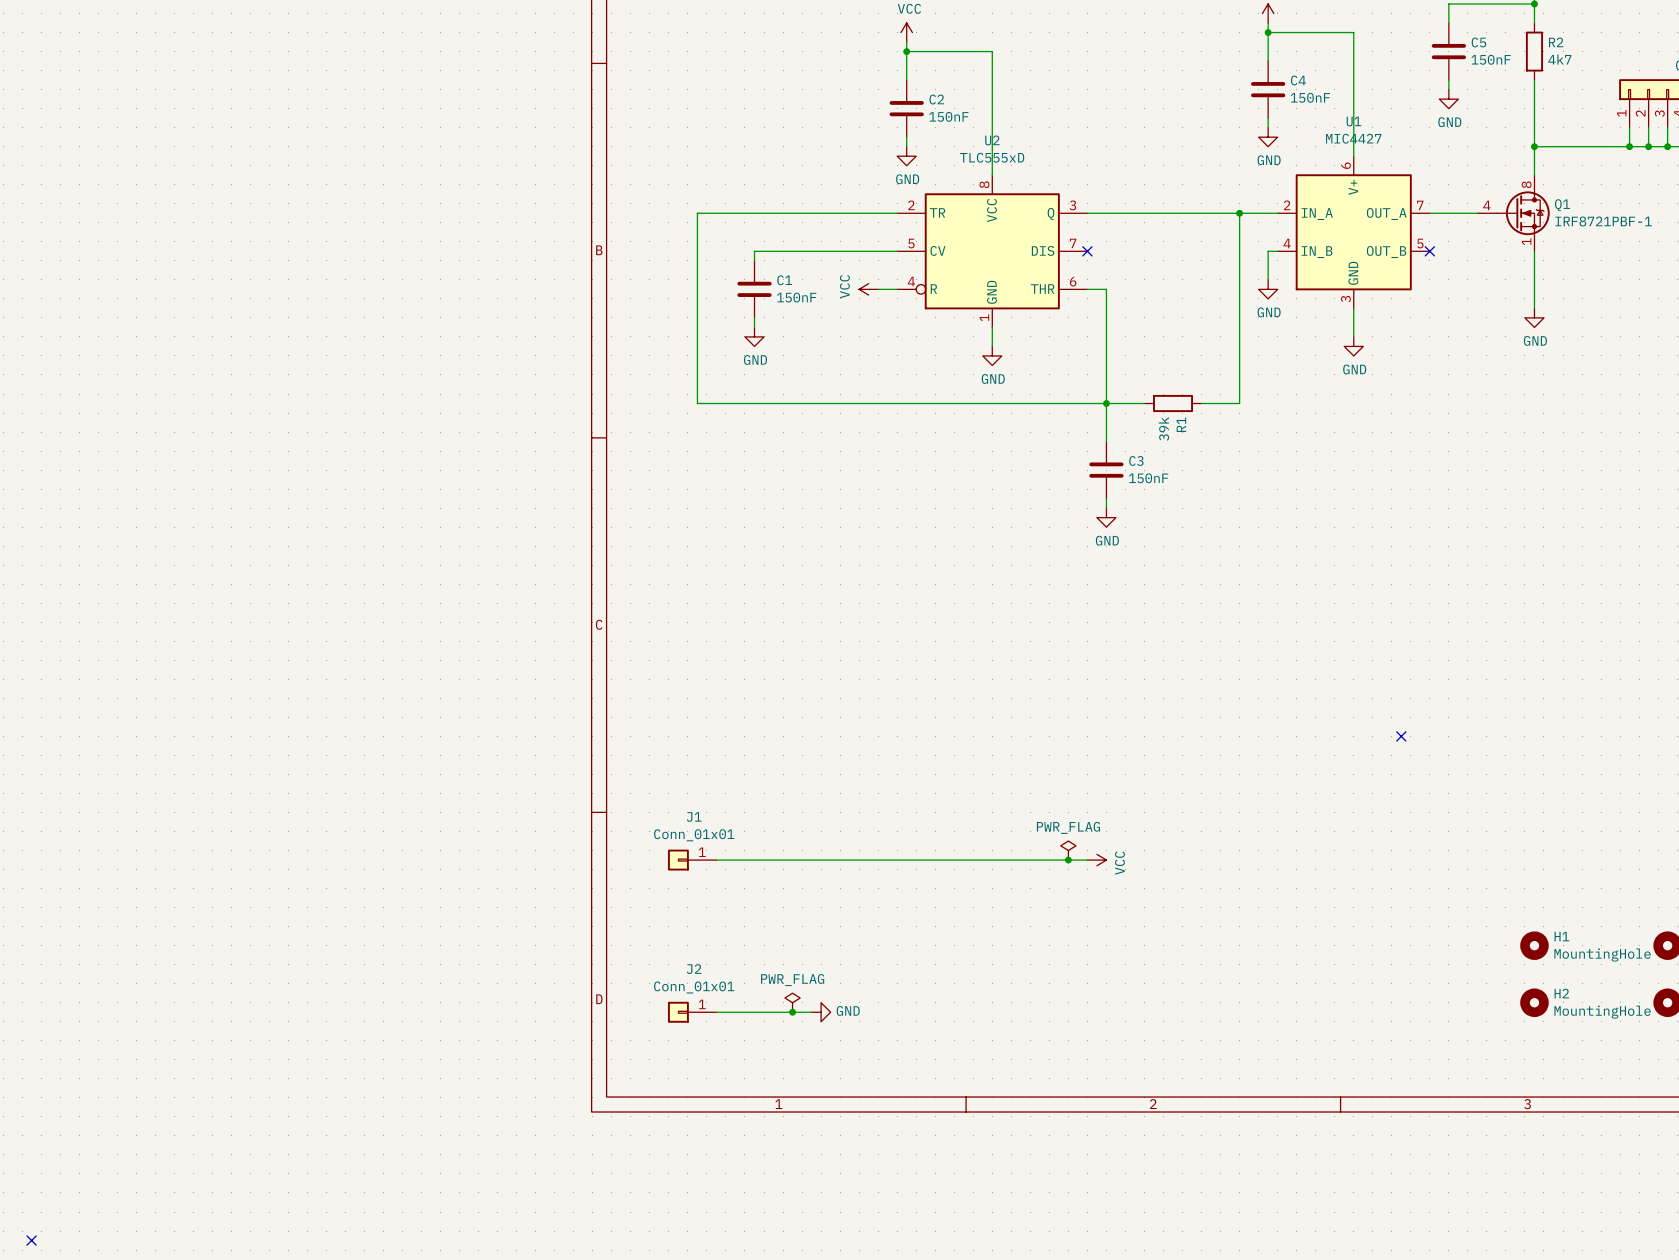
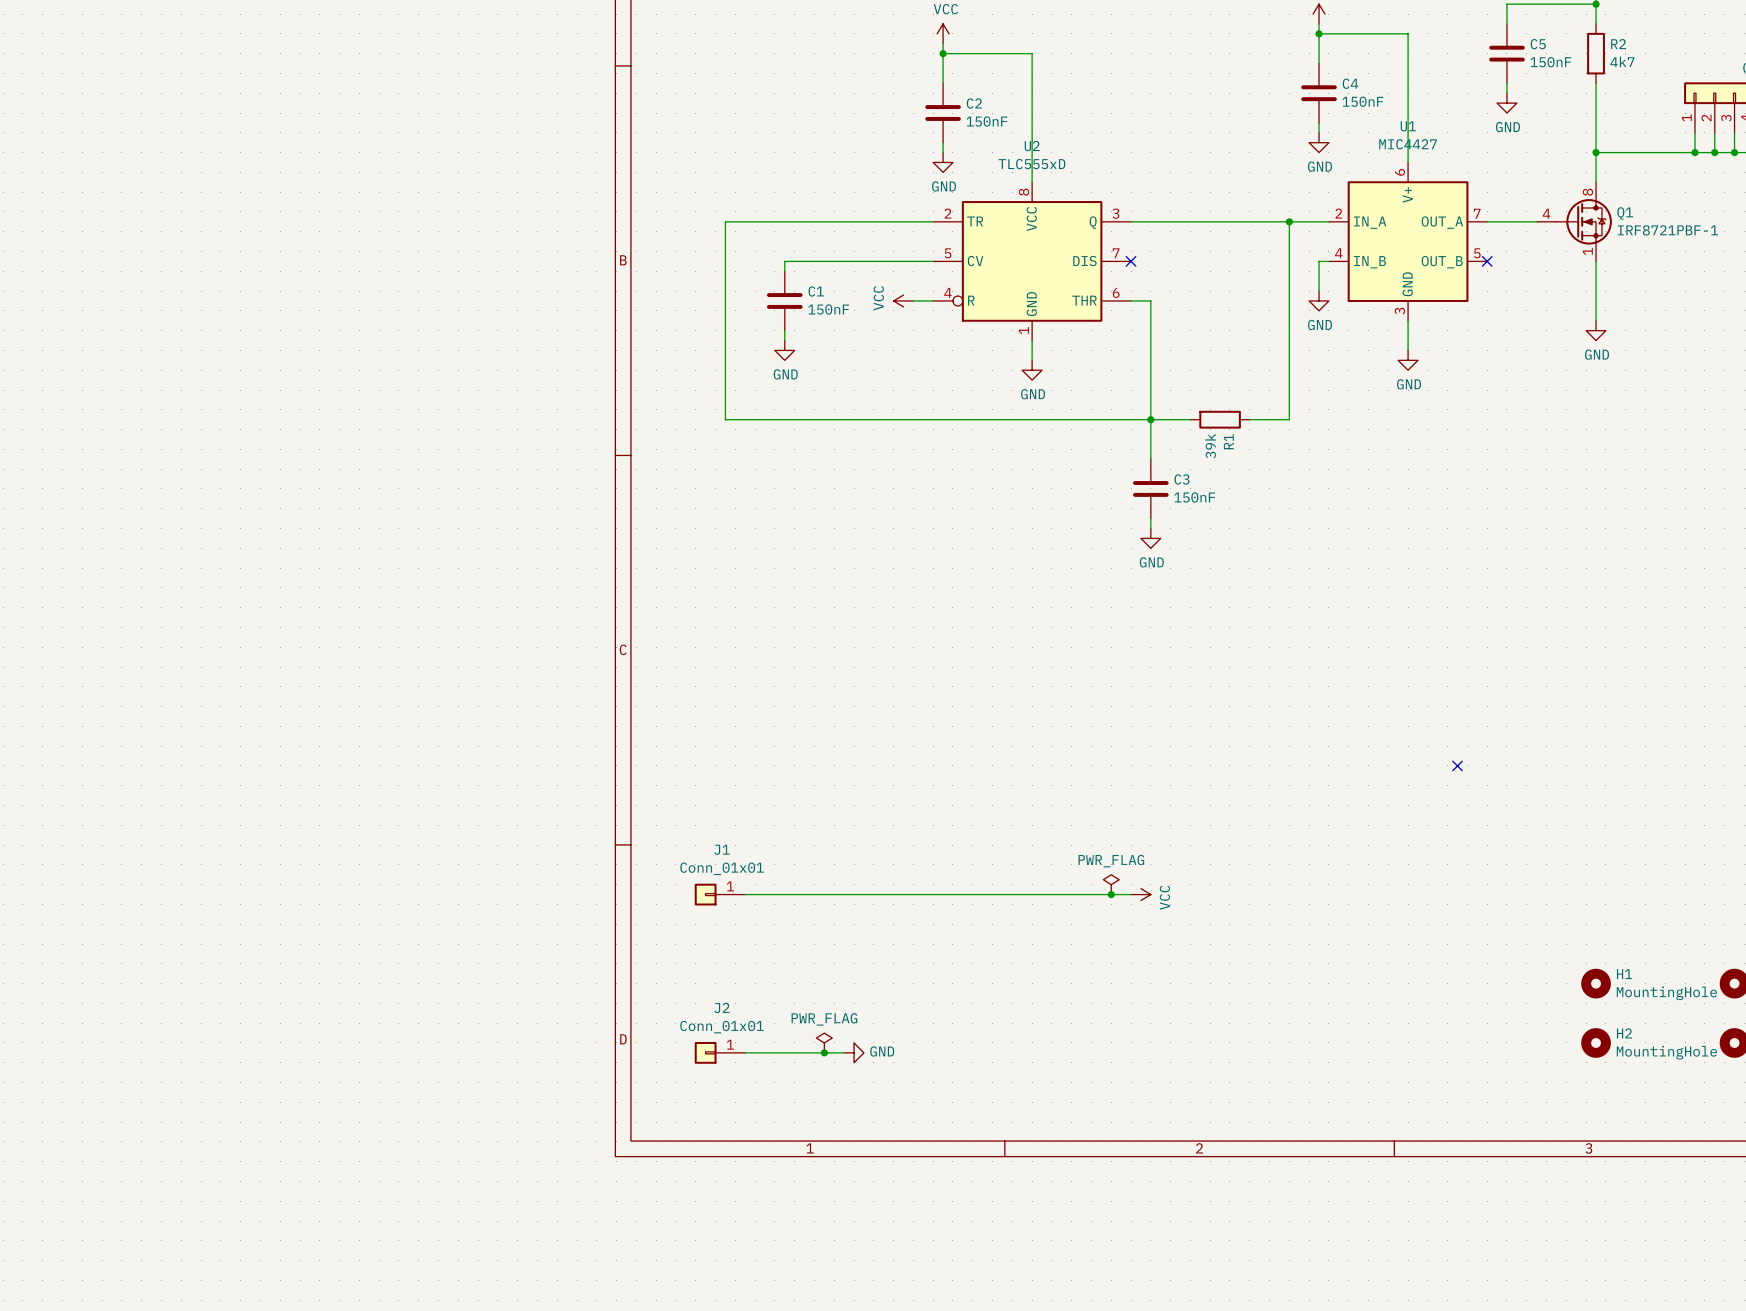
no-connect mark: (31, 1240) -> none

